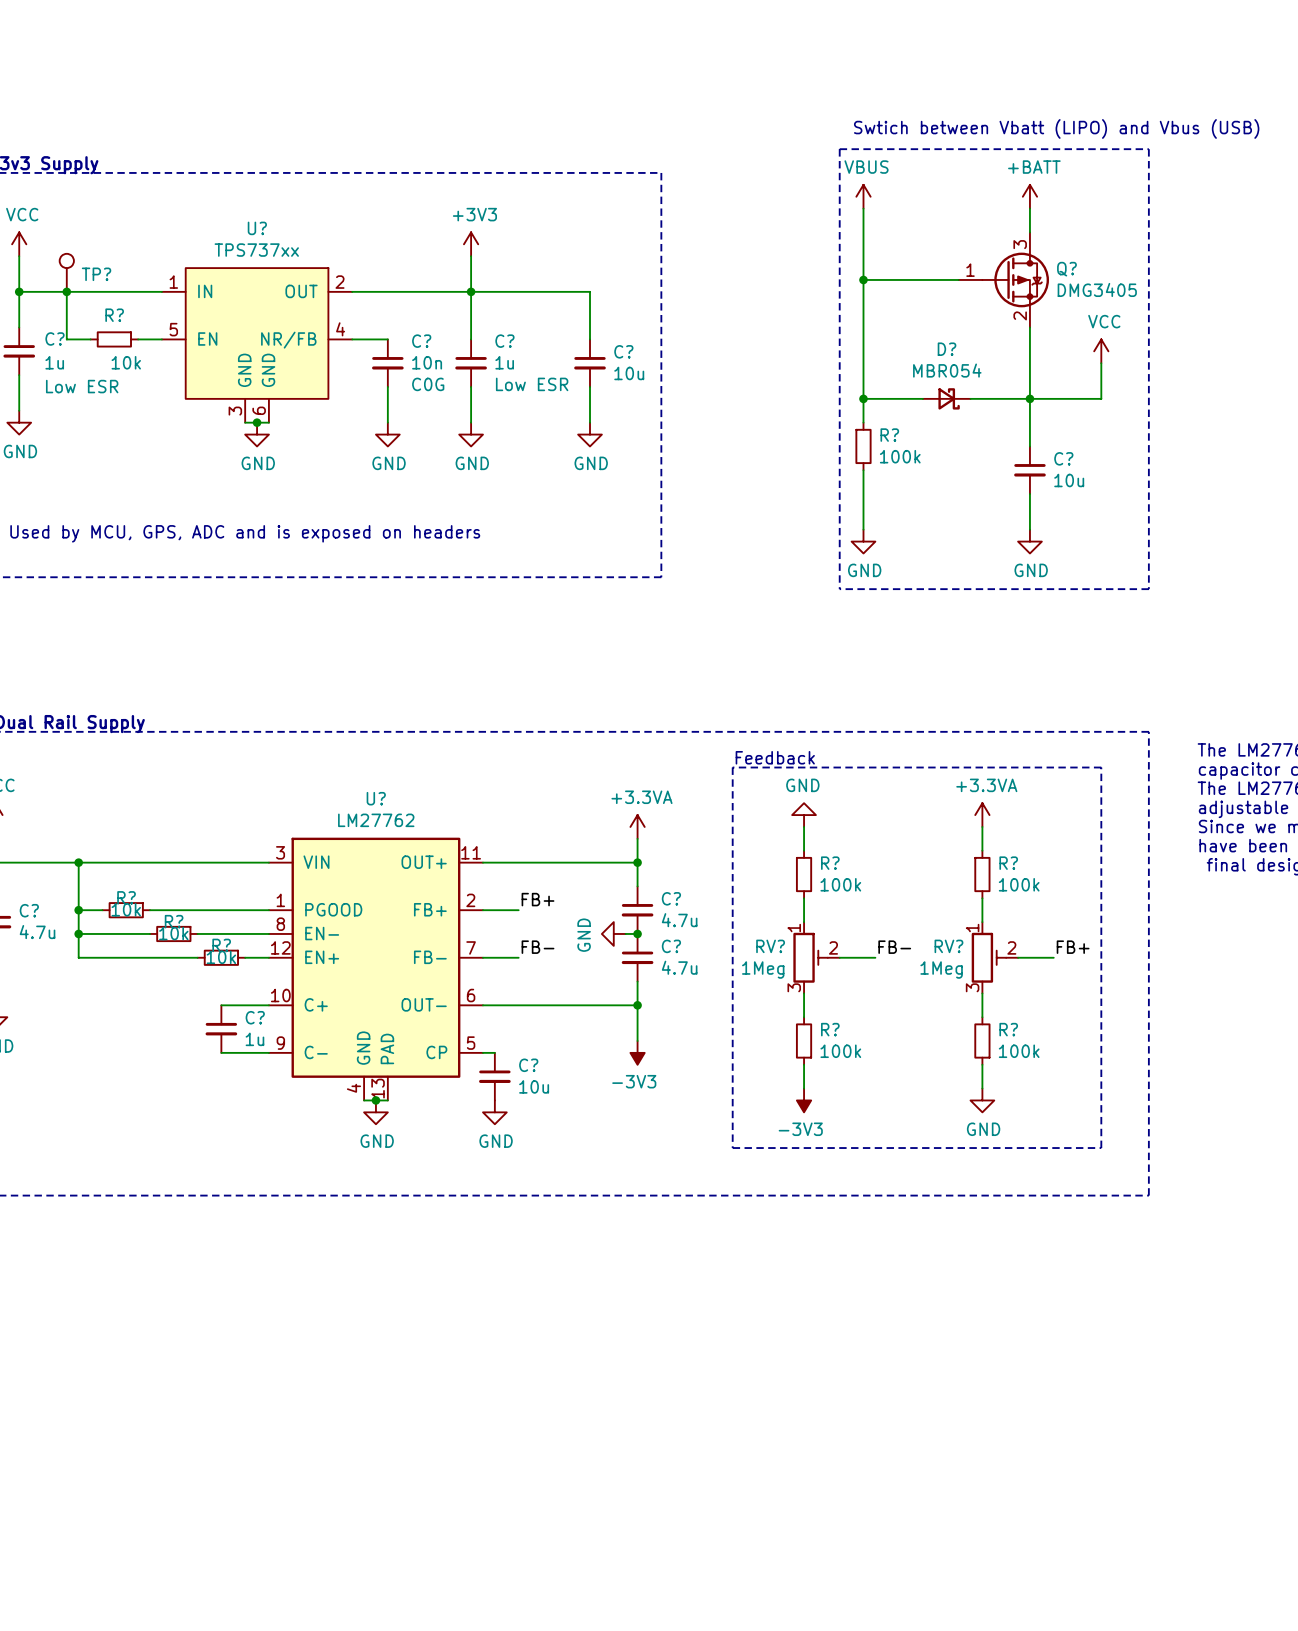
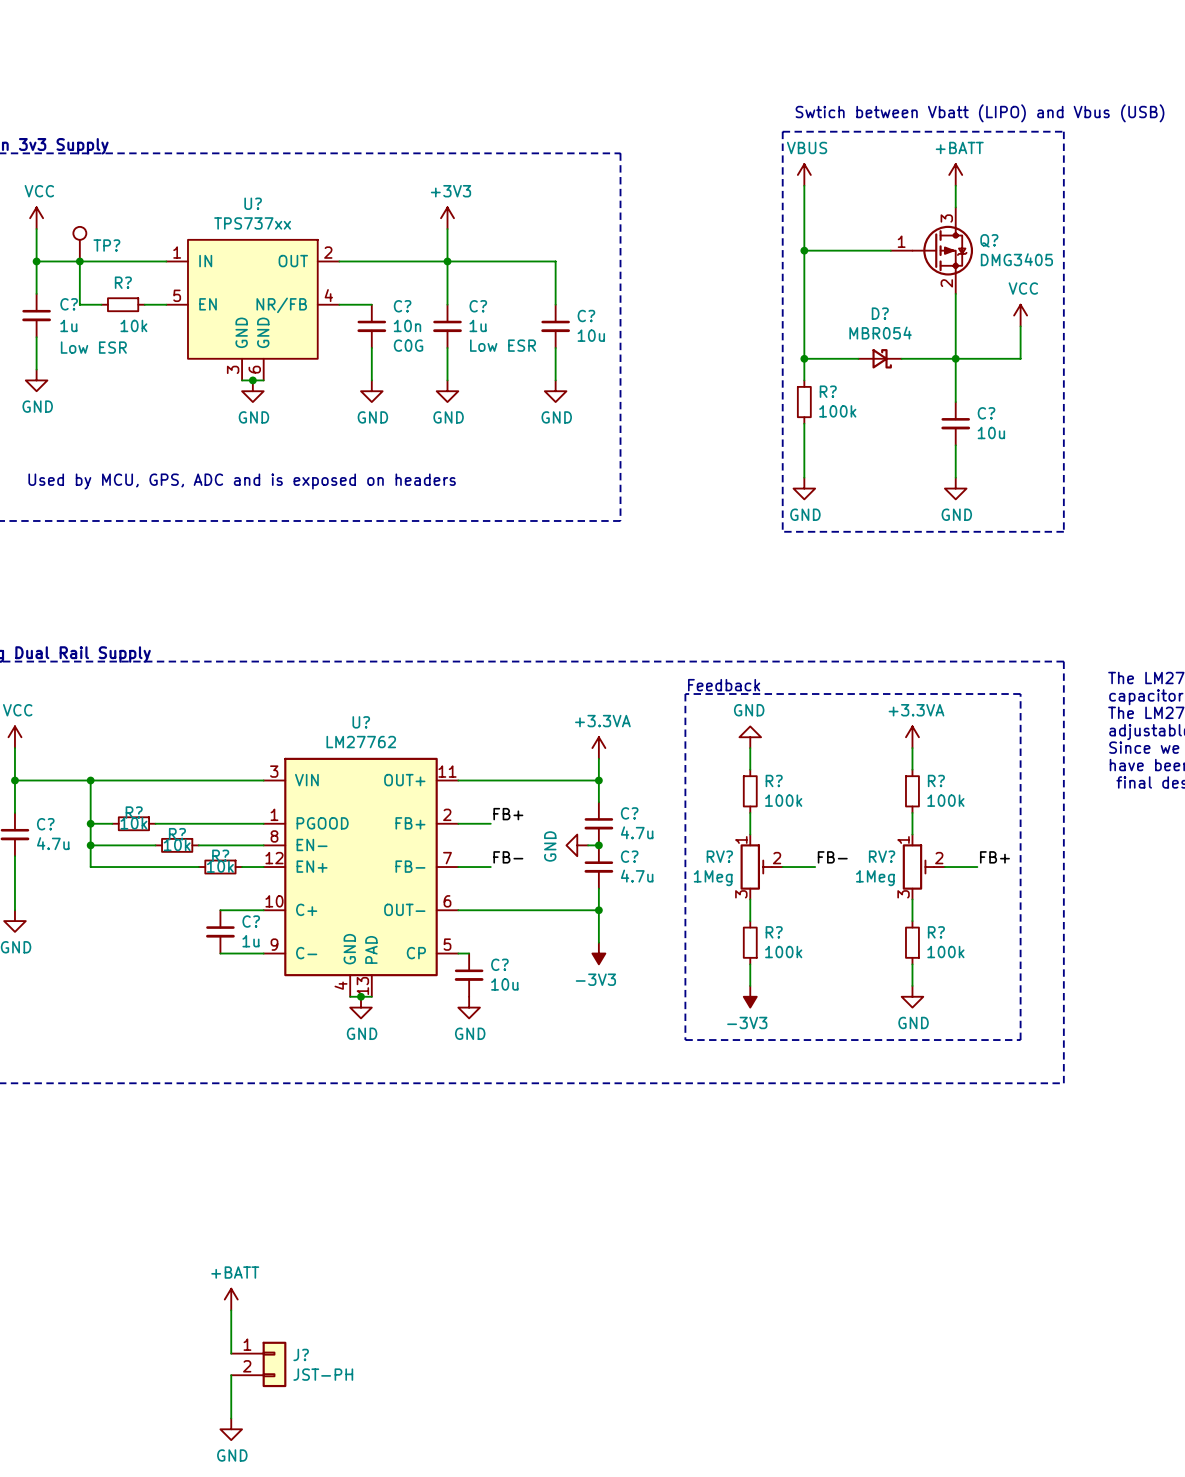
power symbol: none -> +BATT (231, 1299)
wire: none -> (231, 1310) (231, 1353)
J?: none -> JST-PH (258, 1364)
wire: none -> (231, 1375) (231, 1418)
power symbol: none -> GND (231, 1429)

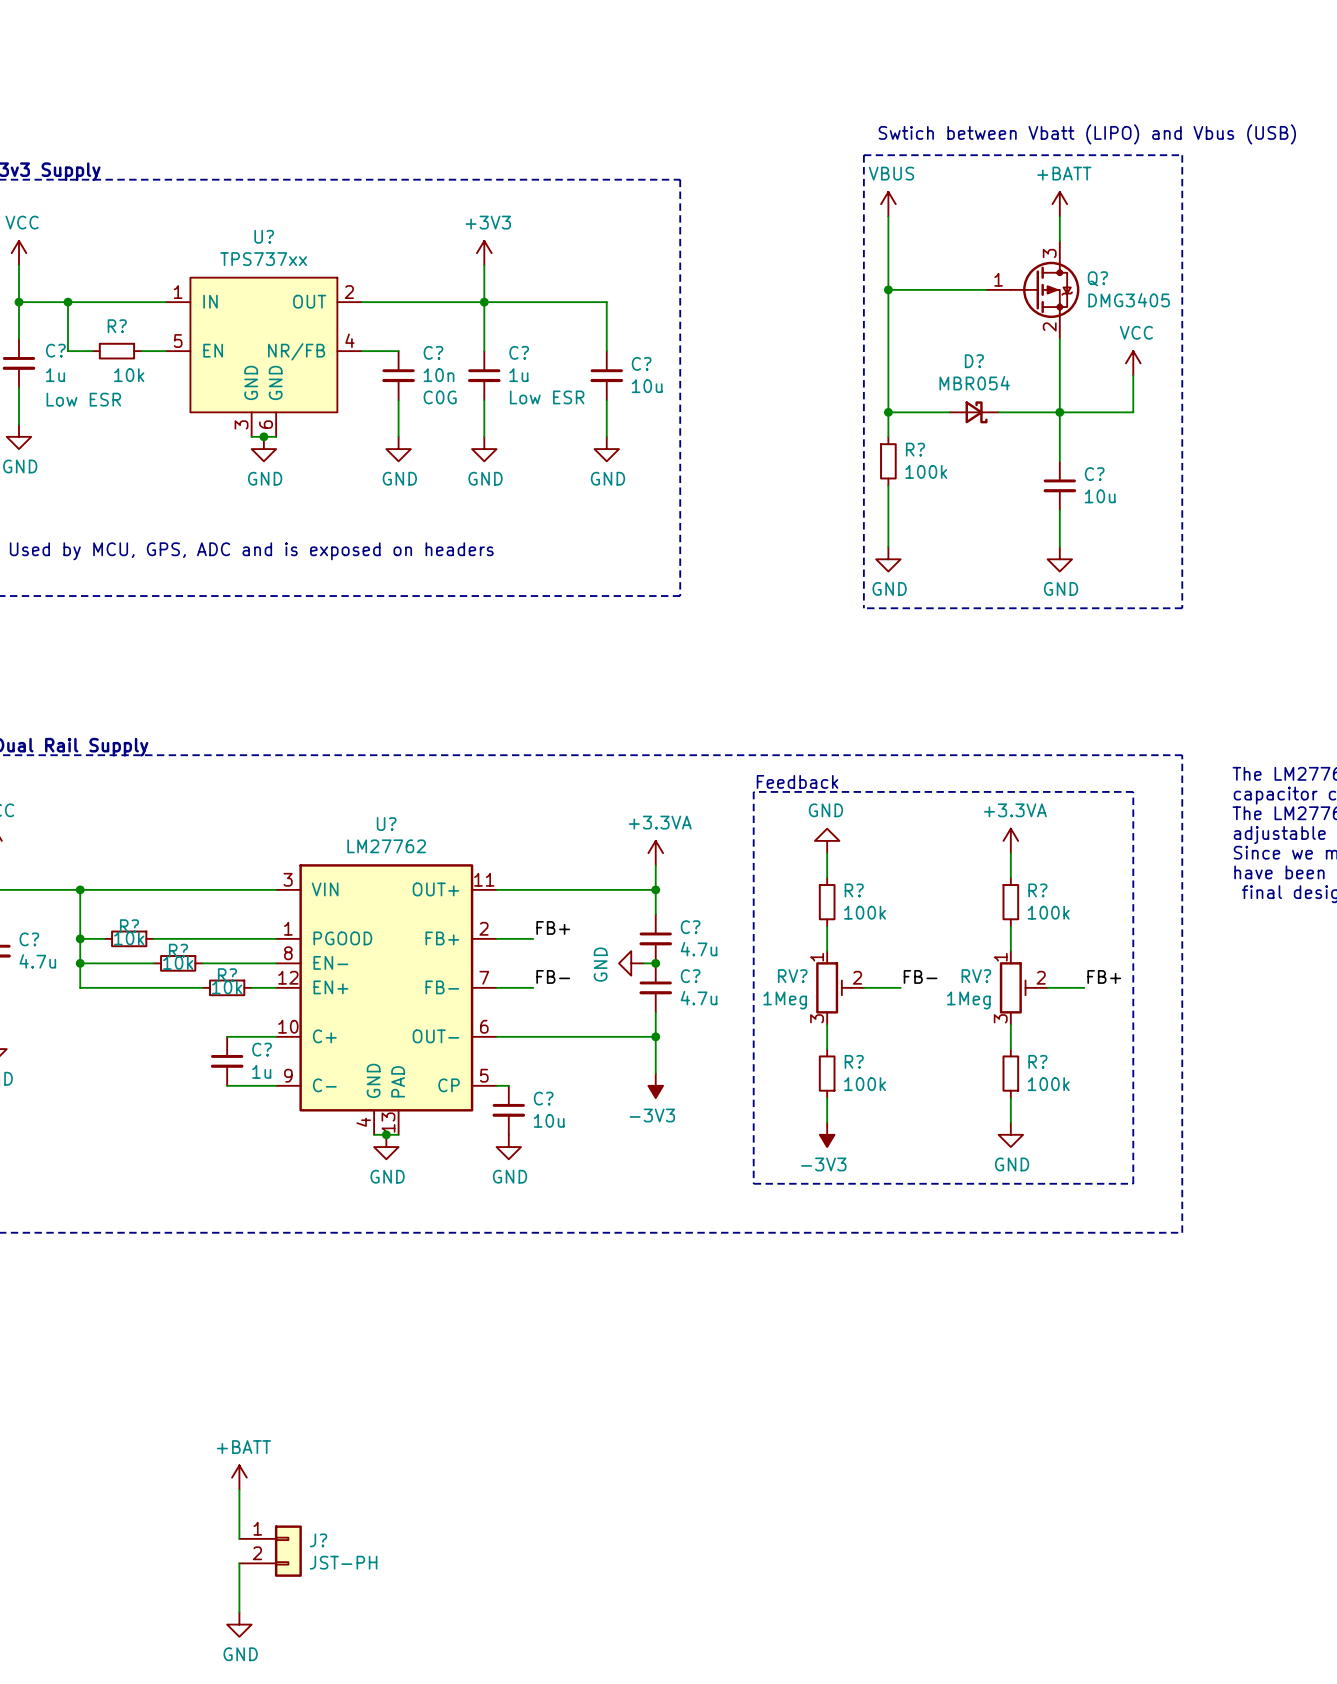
TP?: (79, 244) -> none

